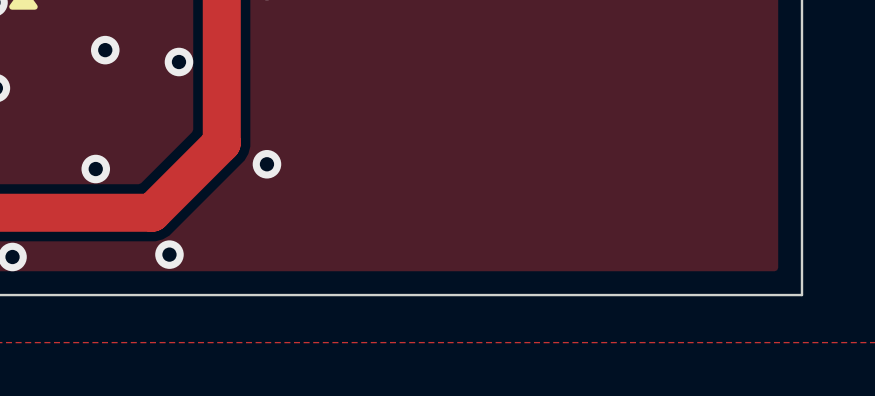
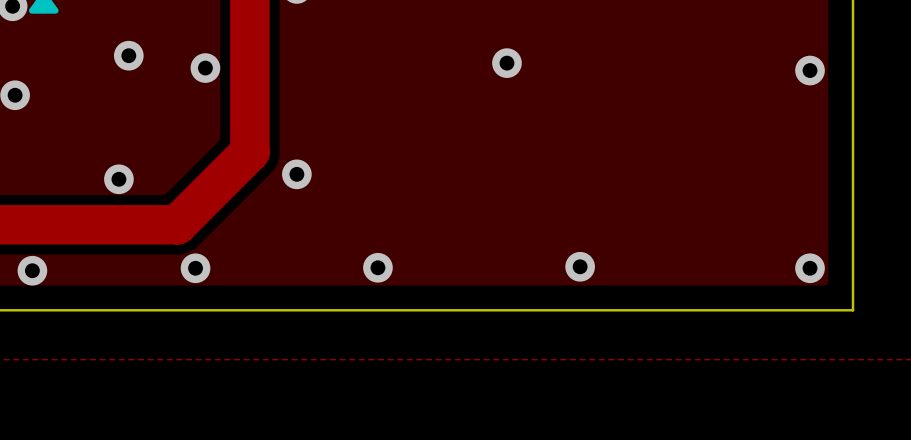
via: none -> (506, 63)
via: none -> (810, 70)
via: none -> (580, 266)
via: none -> (377, 267)
via: none -> (810, 268)

